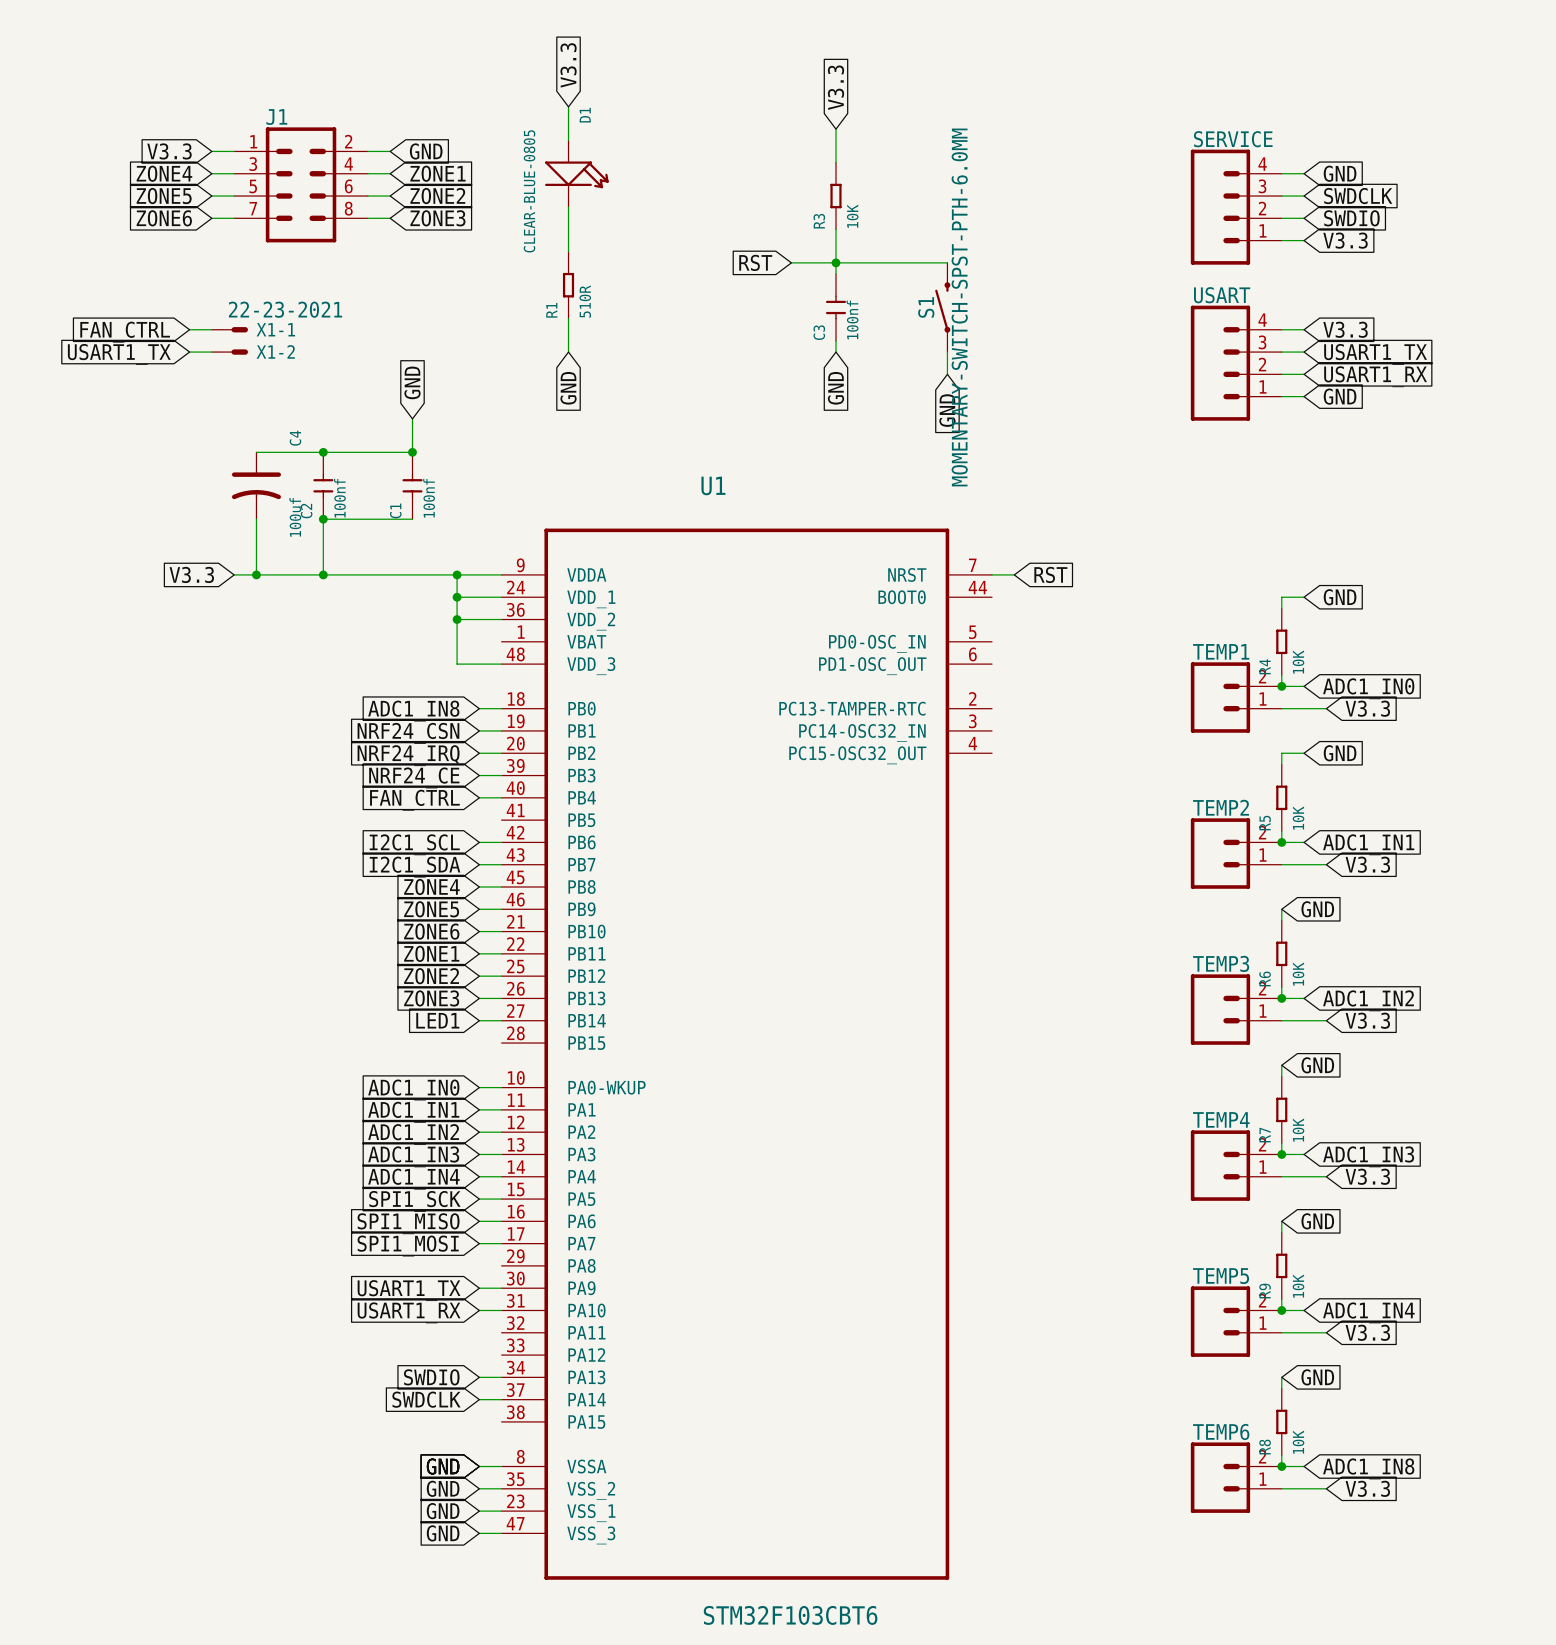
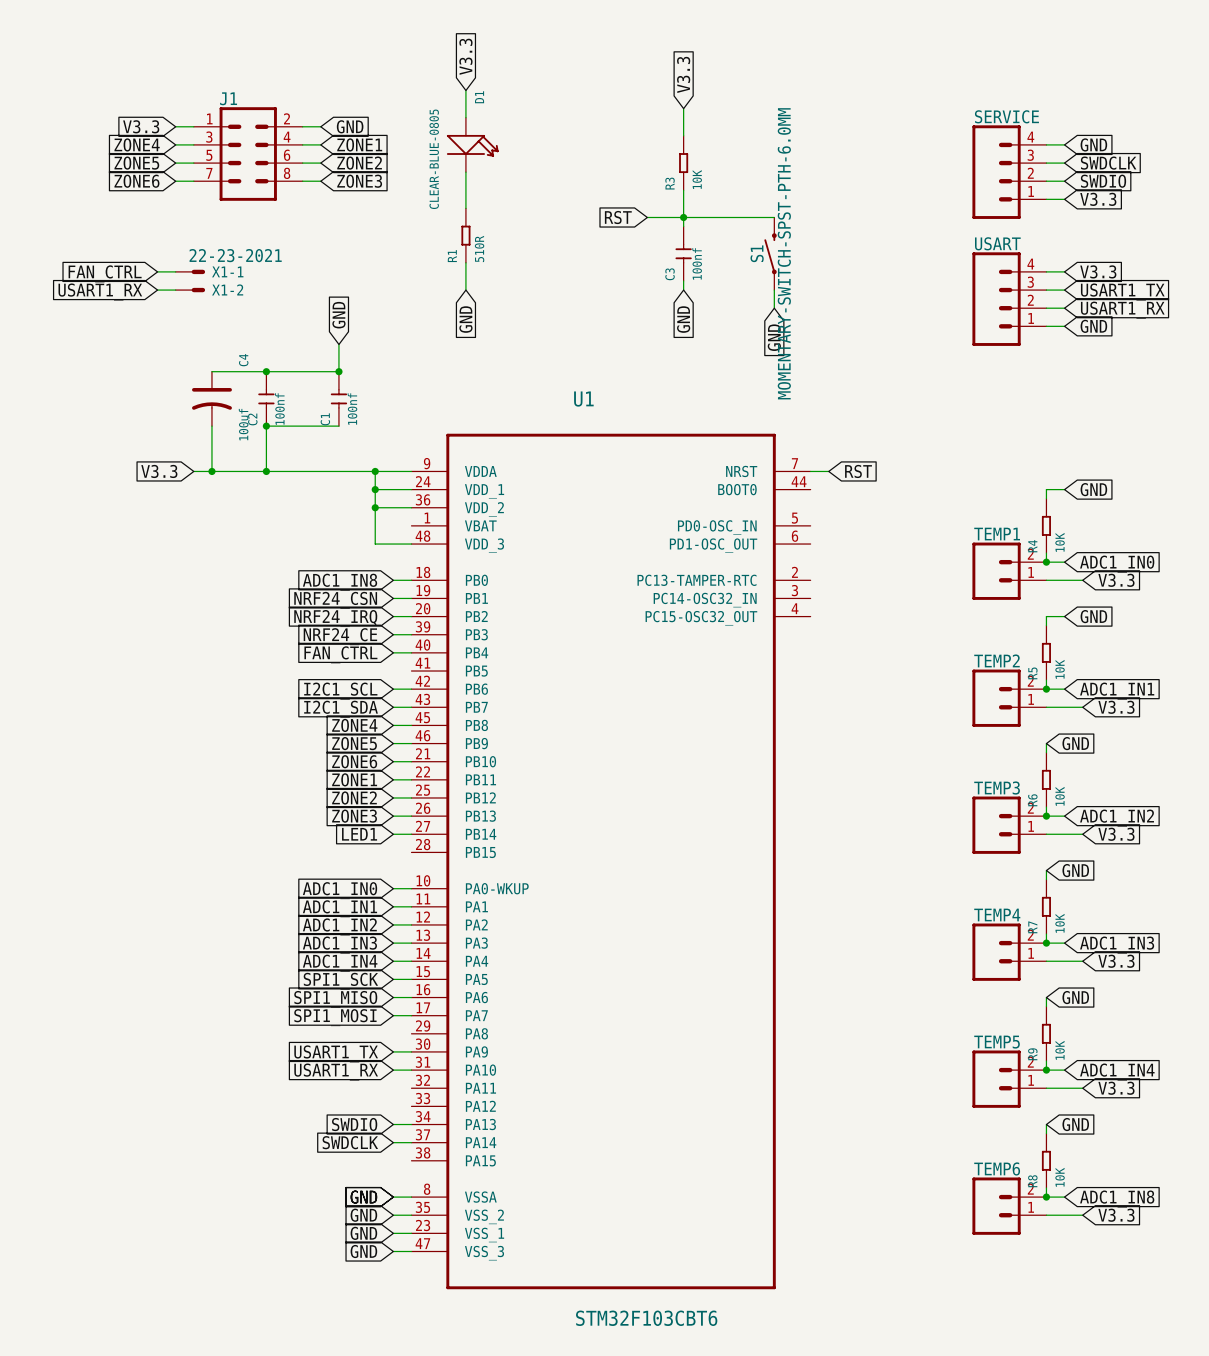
global label: USART1_TX (119, 354) -> USART1_RX (100, 291)

